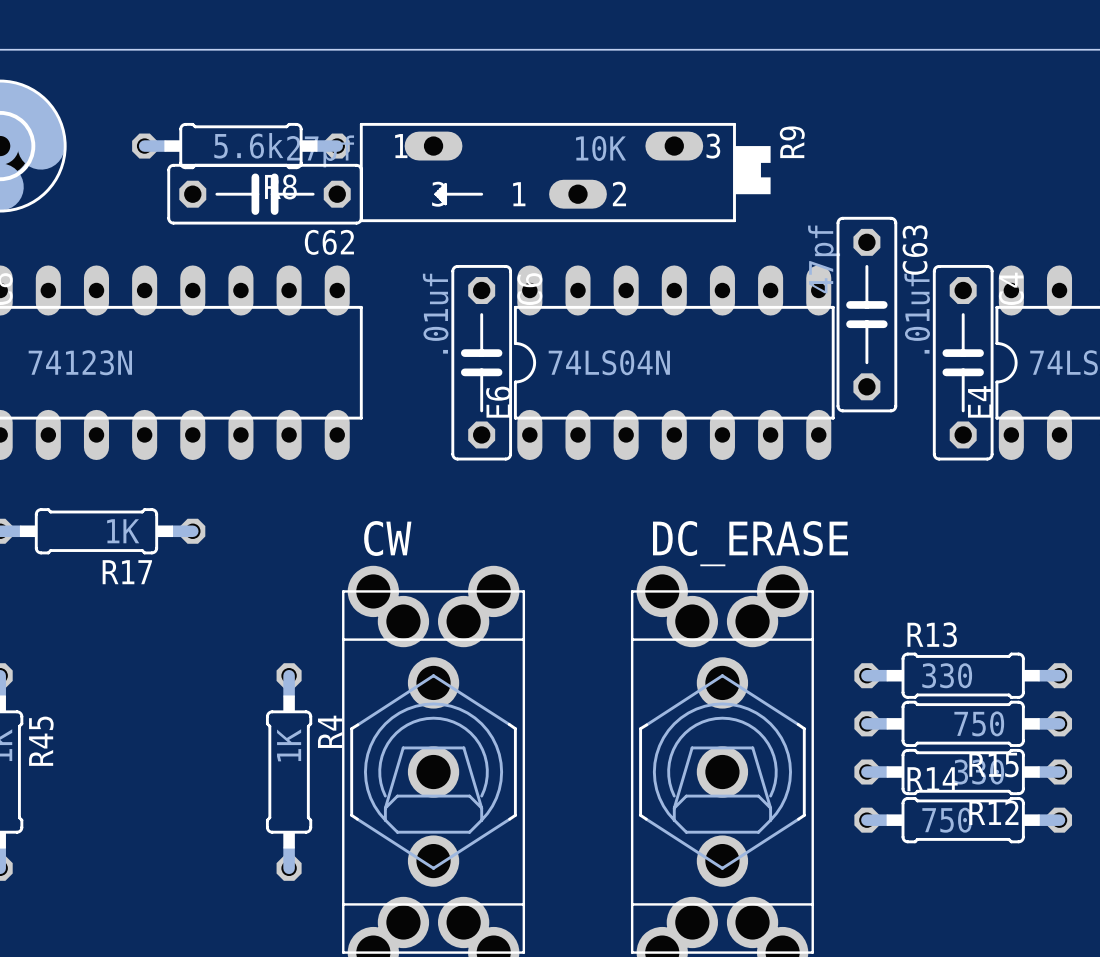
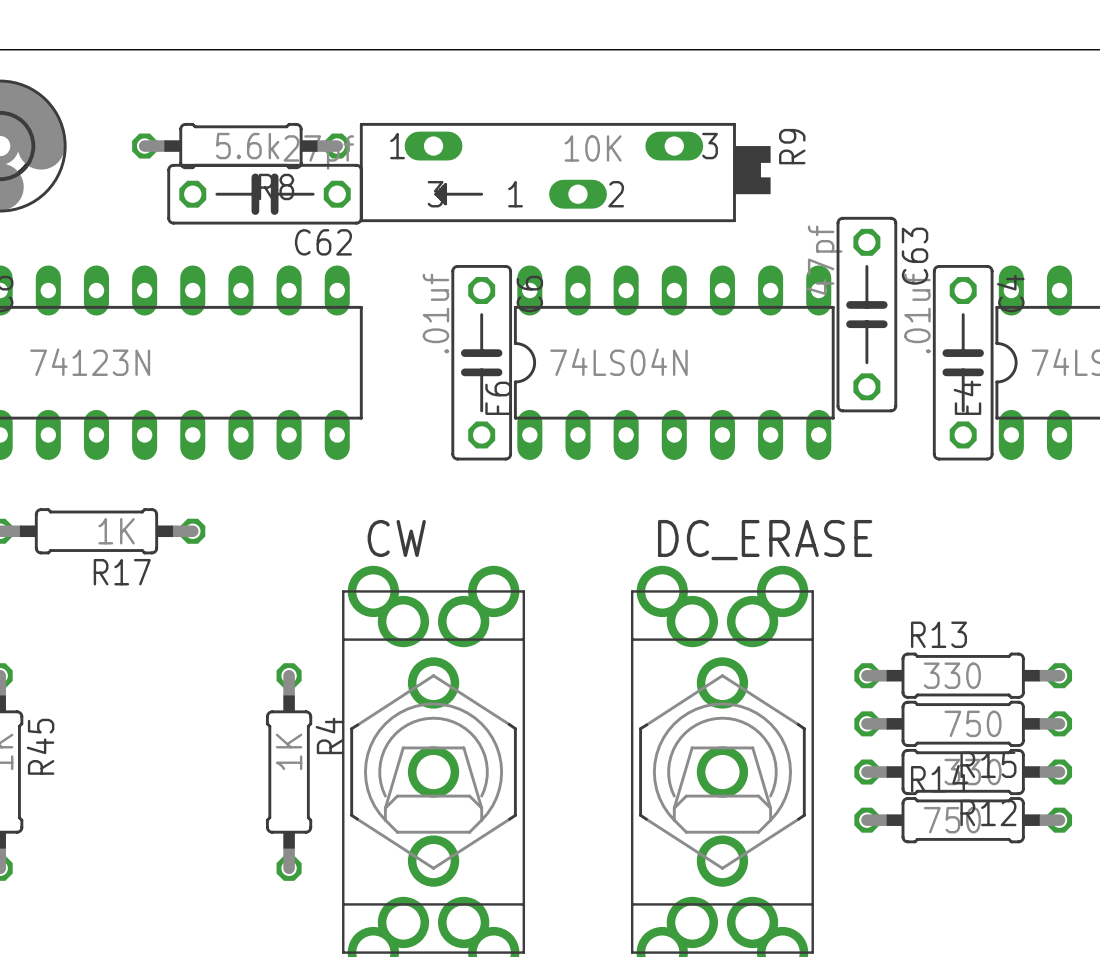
E4 name position: E4 (980, 401) -> E4 (967, 397)

